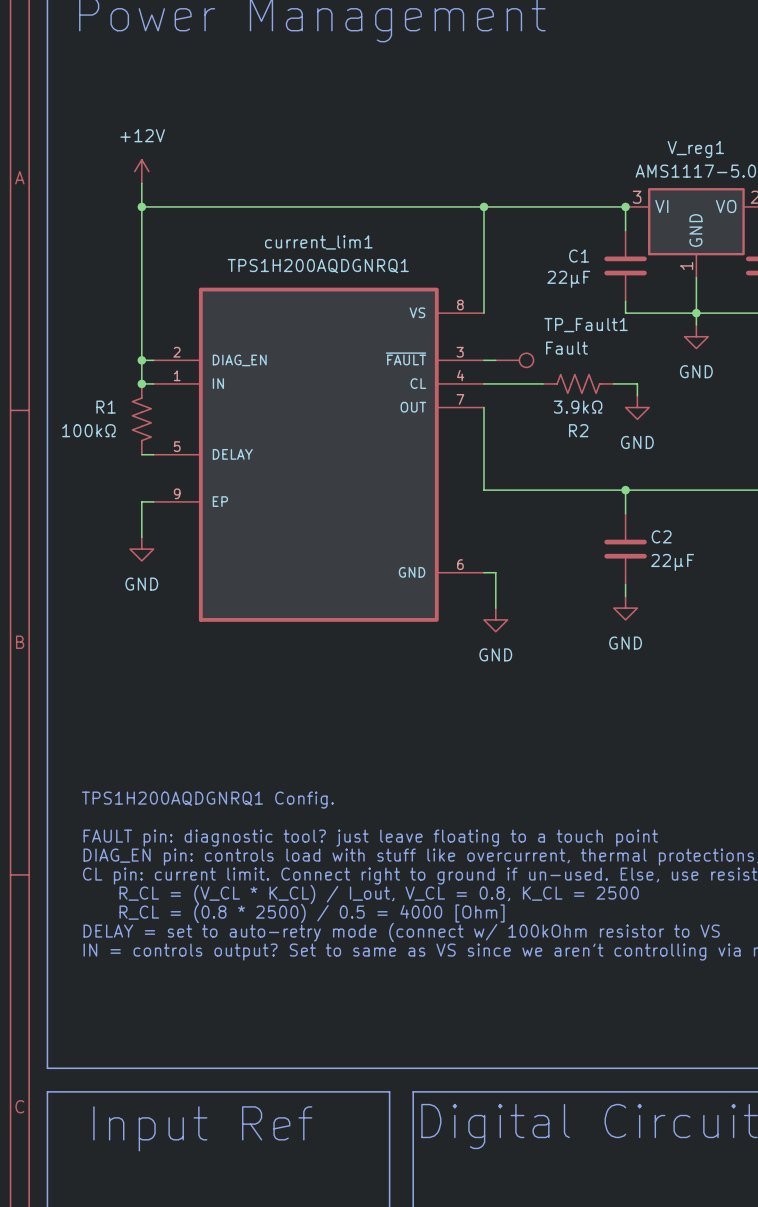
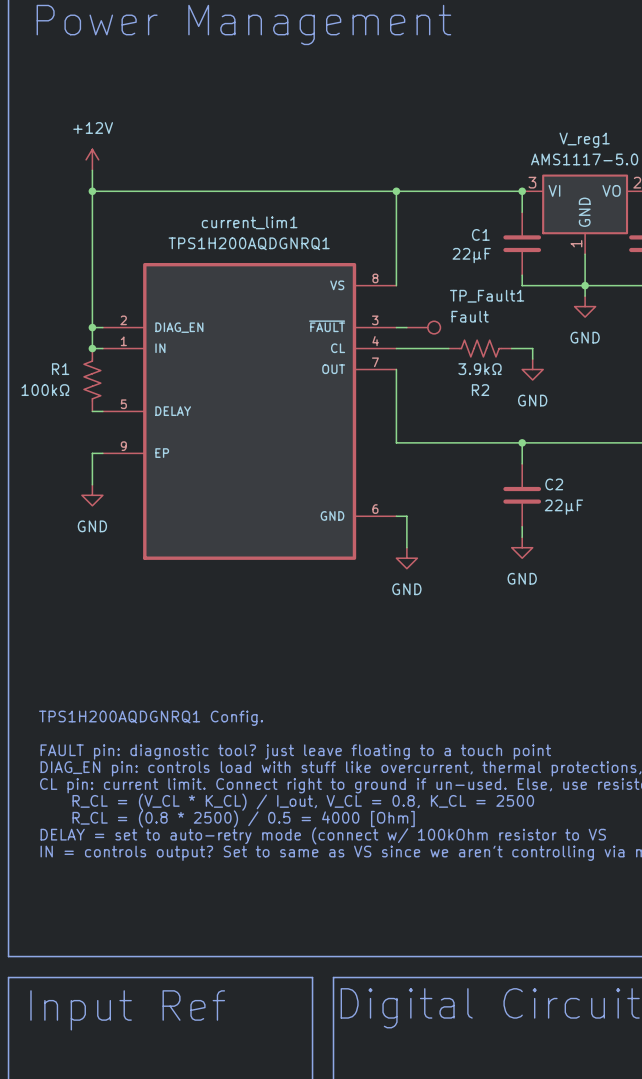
text position: Input Ref (202, 1128) -> Input Ref (127, 1010)

